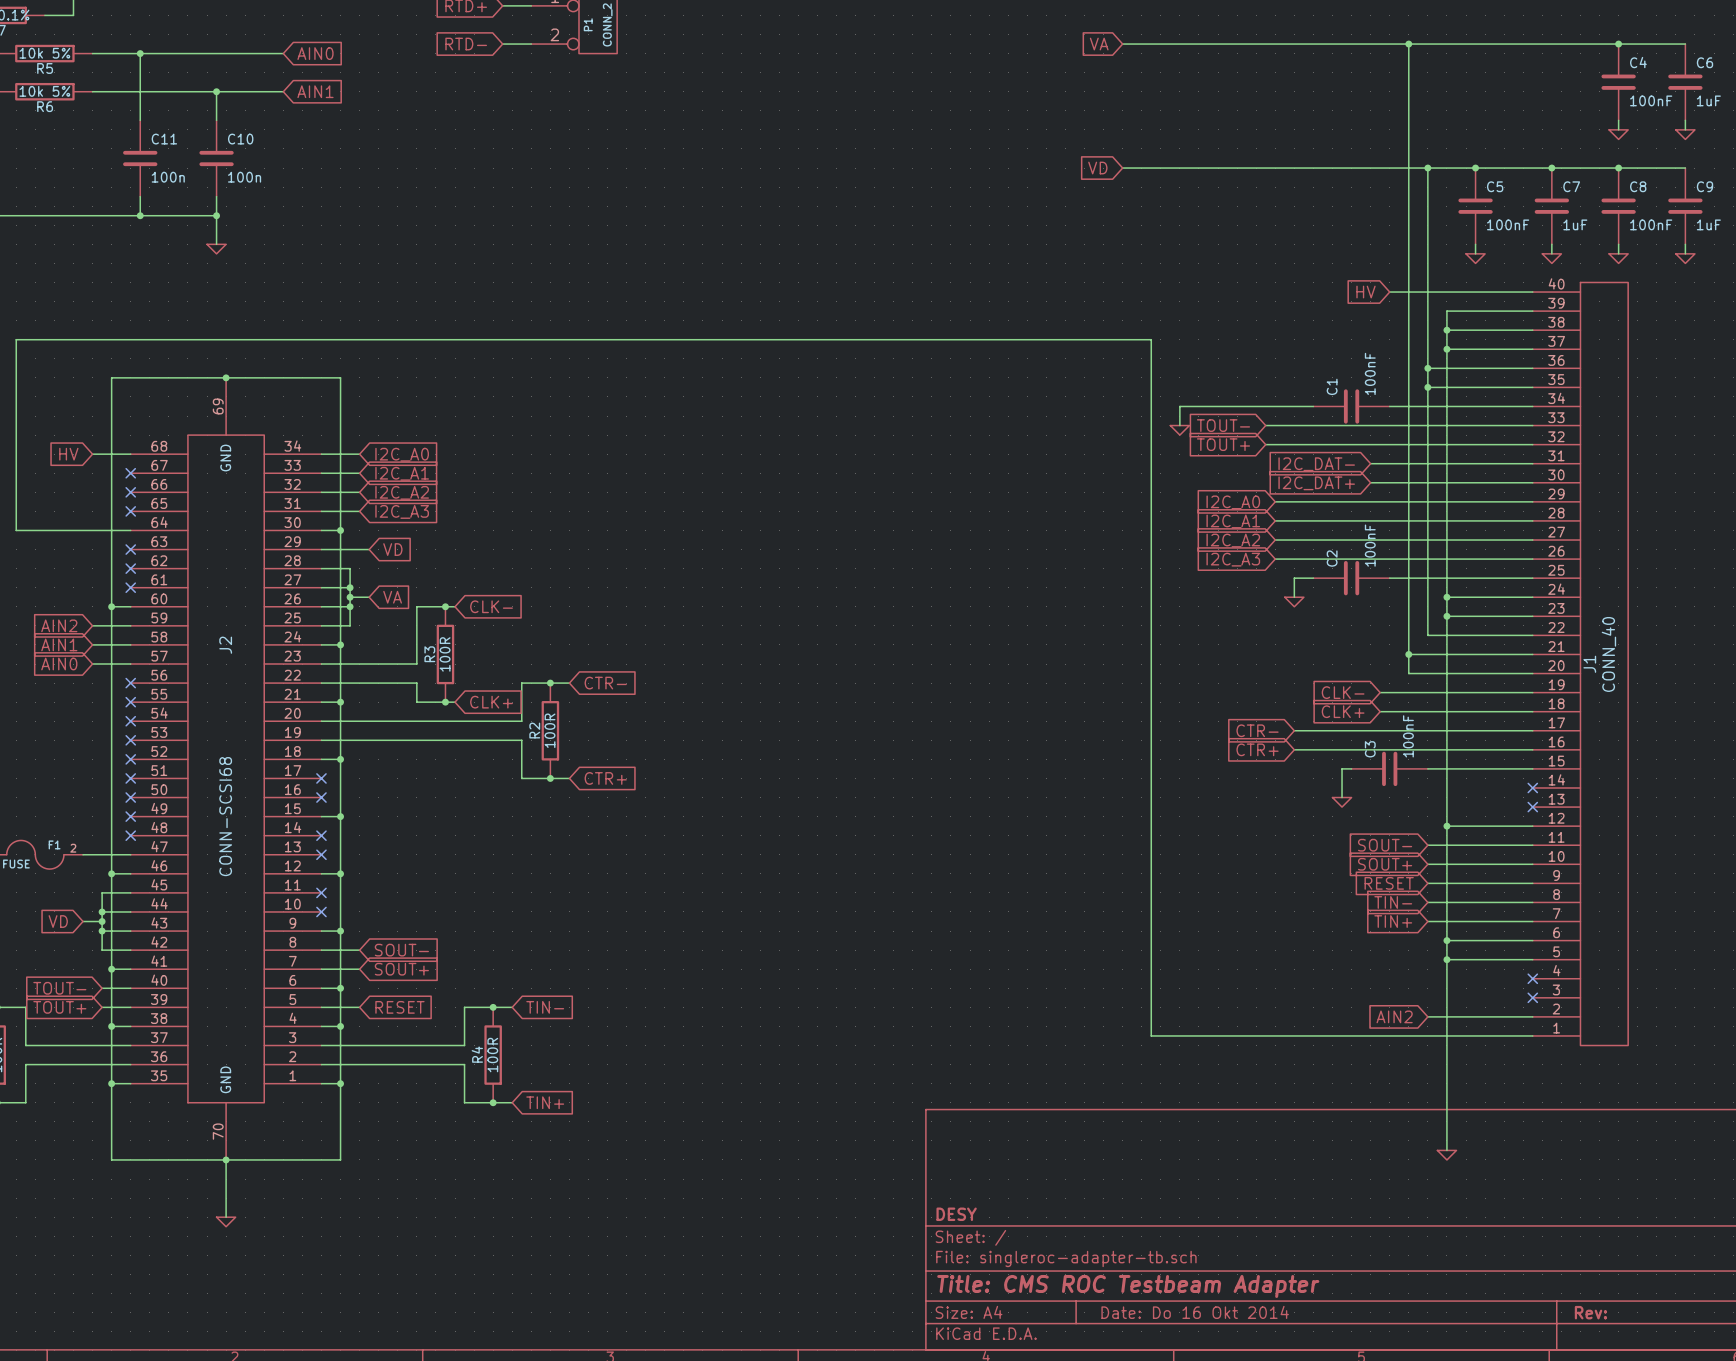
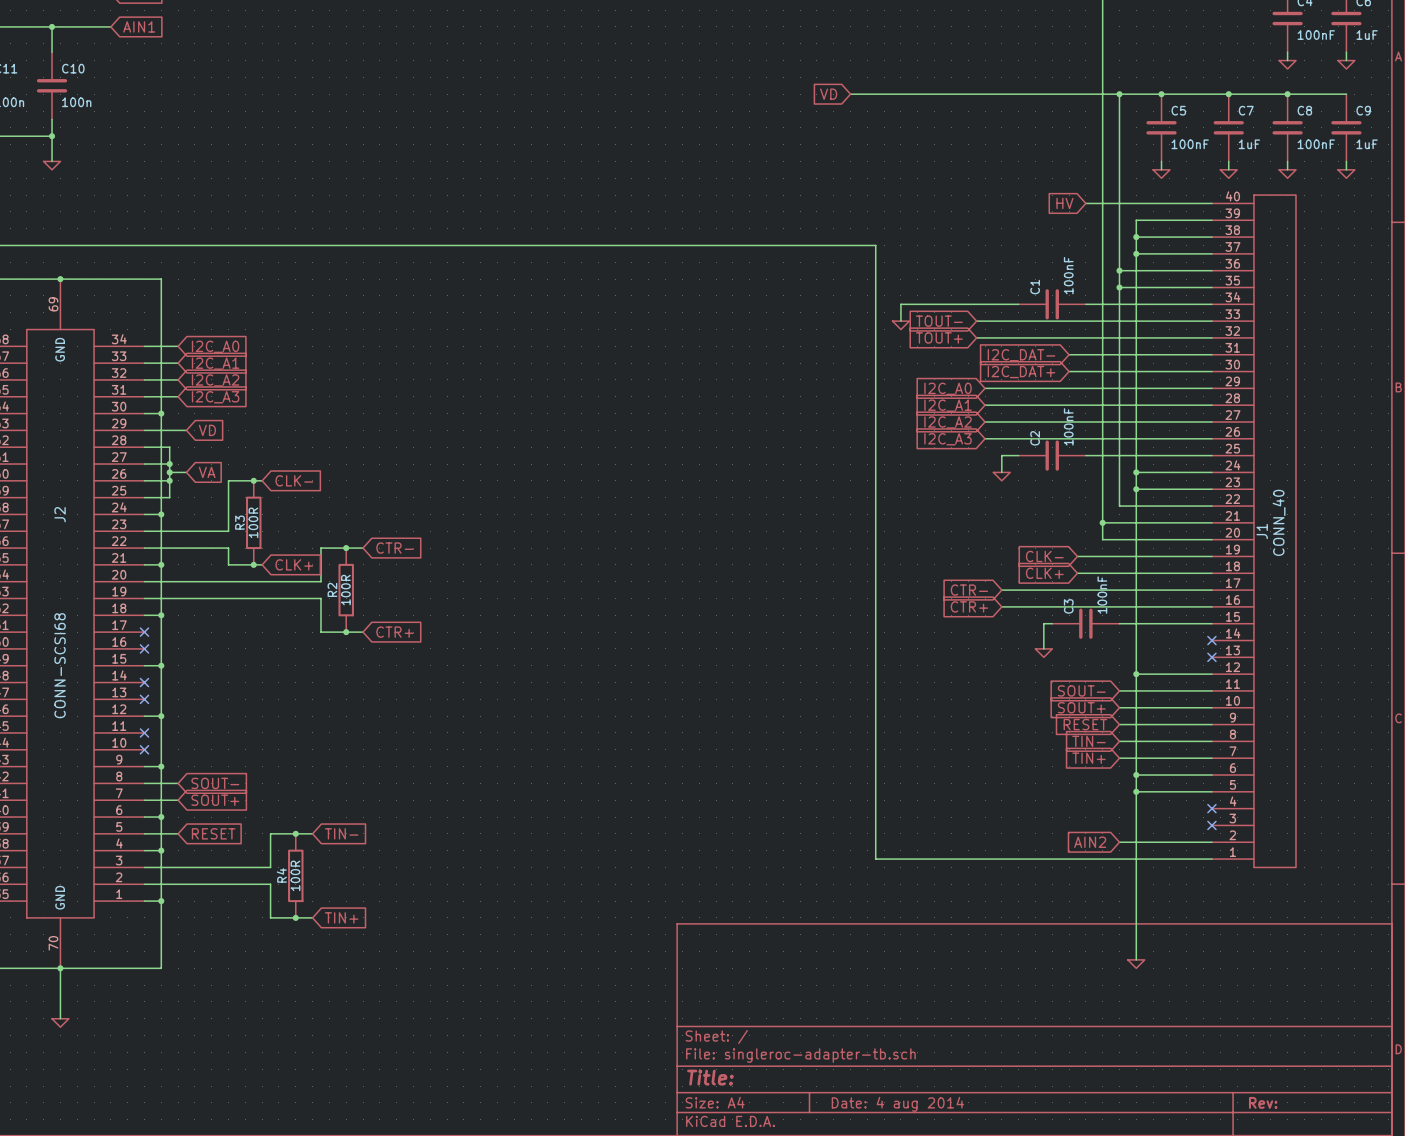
title block: DESY (956, 1214) -> none
title block: Title: CMS ROC Testbeam Adapter (1128, 1286) -> Title: (710, 1077)
title block: Date: Do 16 Okt 2014 (1195, 1312) -> Date: 4 aug 2014 (897, 1104)

